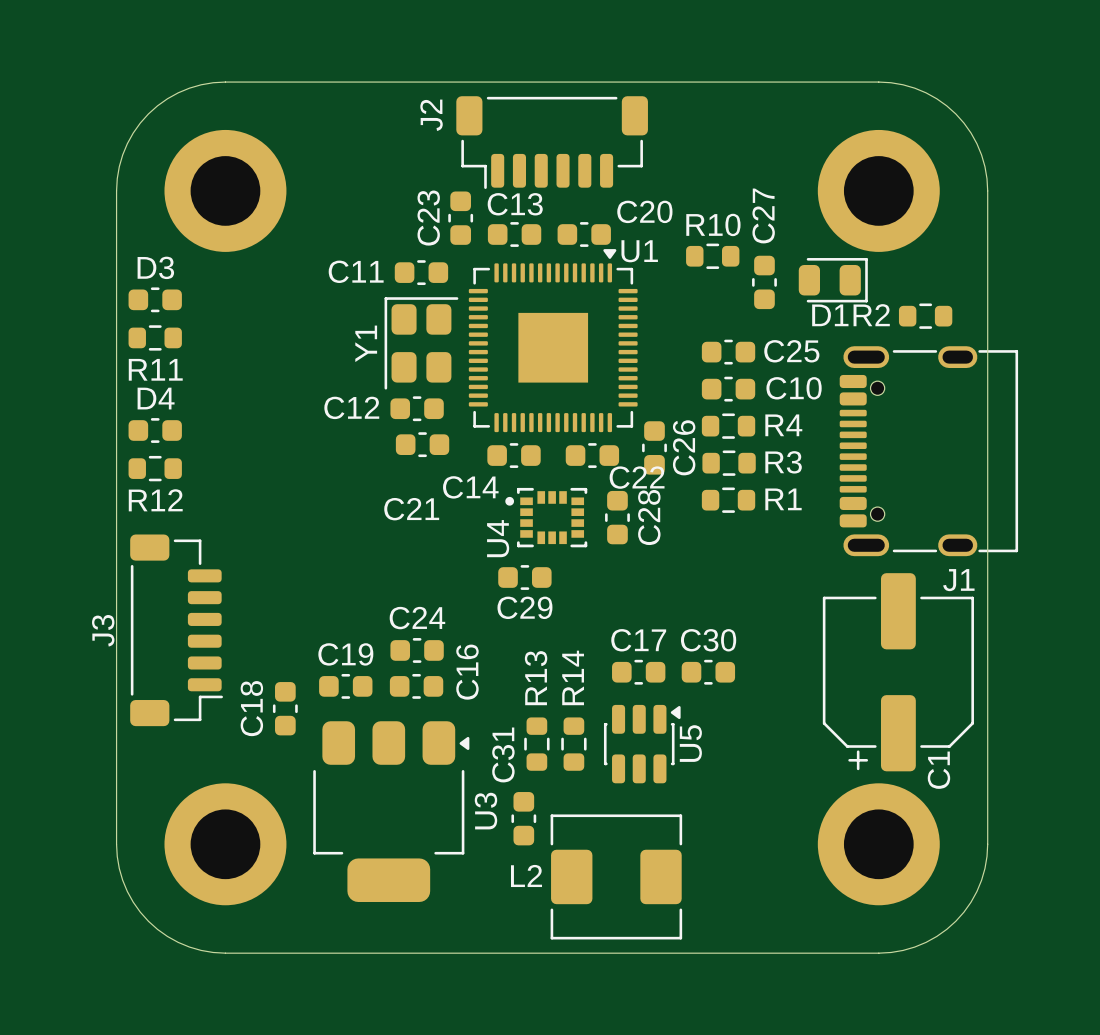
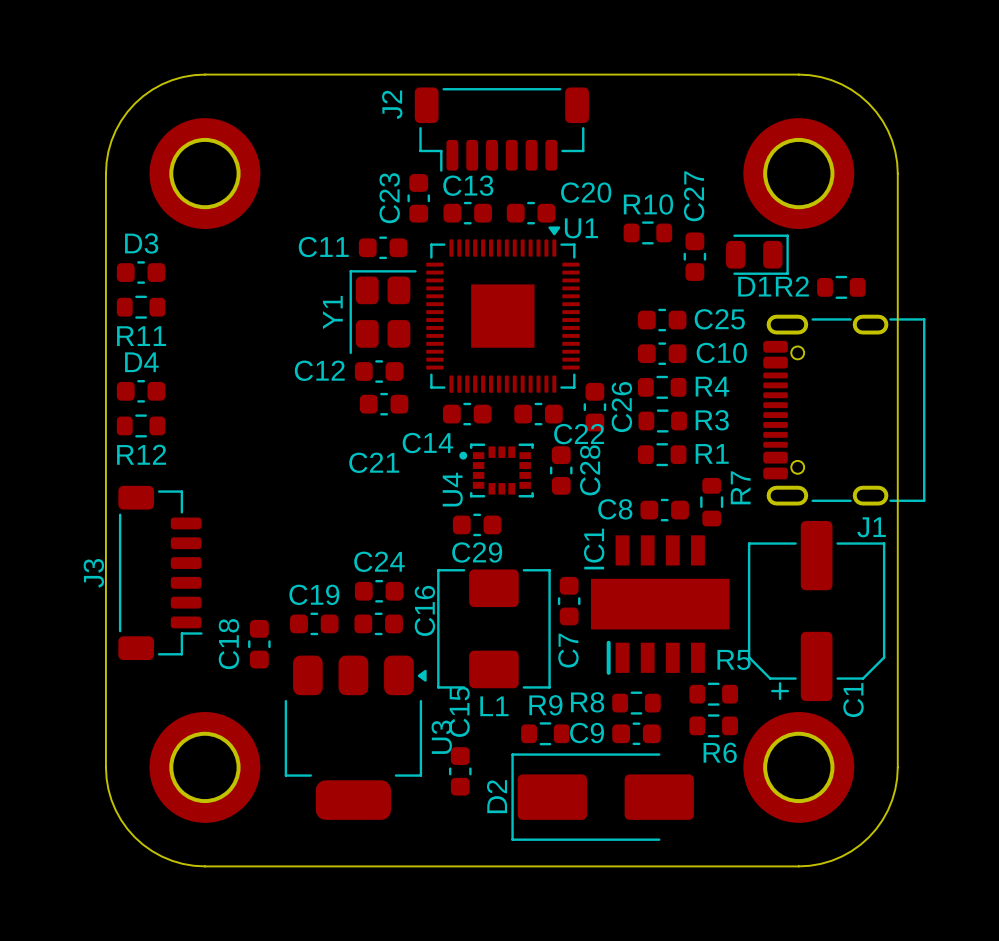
R7: none -> (711, 502)
C8: none -> (664, 510)
C7: none -> (569, 601)
IC1: none -> (660, 605)
C17: (638, 672) -> none
C30: (708, 672) -> none
L1: none -> (493, 628)
R13: (536, 744) -> none
R14: (573, 744) -> none
U5: (642, 744) -> none
R5: none -> (713, 694)
R8: none -> (636, 703)
R6: none -> (713, 725)
R9: none -> (545, 733)
C9: none -> (636, 733)
C31: (523, 818) -> none
C15: none -> (460, 771)
L2: (616, 876) -> none
D2: none -> (602, 797)

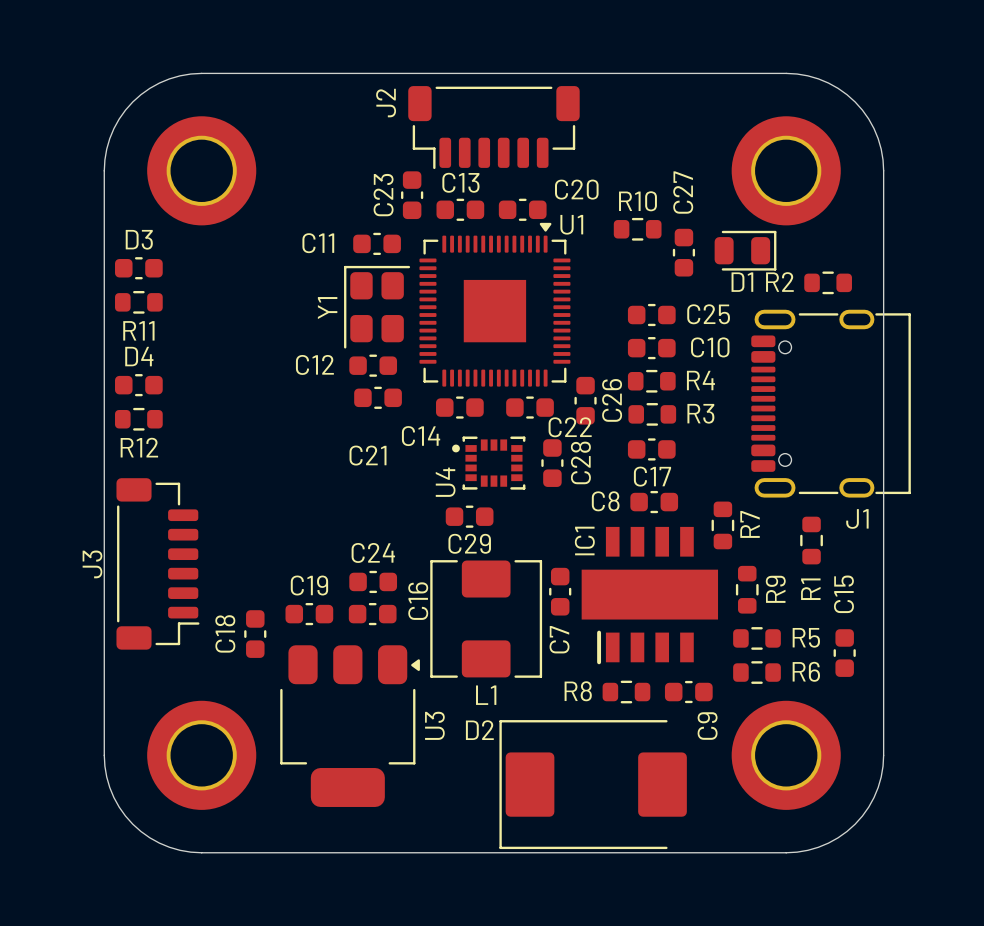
R1 rotation: 0° (662, 454) -> 90° clockwise (811, 540)
R1 position: (662, 454) -> (811, 540)
C17: none -> (651, 449)
R7 name position: R7 (740, 487) -> R7 (750, 524)
R7 position: (711, 502) -> (722, 525)
C1: (816, 611) -> none
R5 name position: R5 (734, 659) -> R5 (806, 637)
R5 position: (713, 694) -> (757, 638)
R6 position: (713, 725) -> (757, 672)
R9 rotation: 0° (545, 733) -> 90° clockwise (747, 589)
R9 position: (545, 733) -> (747, 589)
C9 name rotation: 0° (587, 733) -> 90° counterclockwise (707, 726)
C9 name position: C9 (587, 733) -> C9 (707, 726)
C9 position: (636, 733) -> (688, 692)
R6 name position: R6 (720, 752) -> R6 (806, 671)
D2 footprint: [511, 753, 694, 841] -> [499, 720, 687, 850]
C15 position: (460, 771) -> (844, 653)
D2 name position: D2 (497, 796) -> D2 (479, 730)

